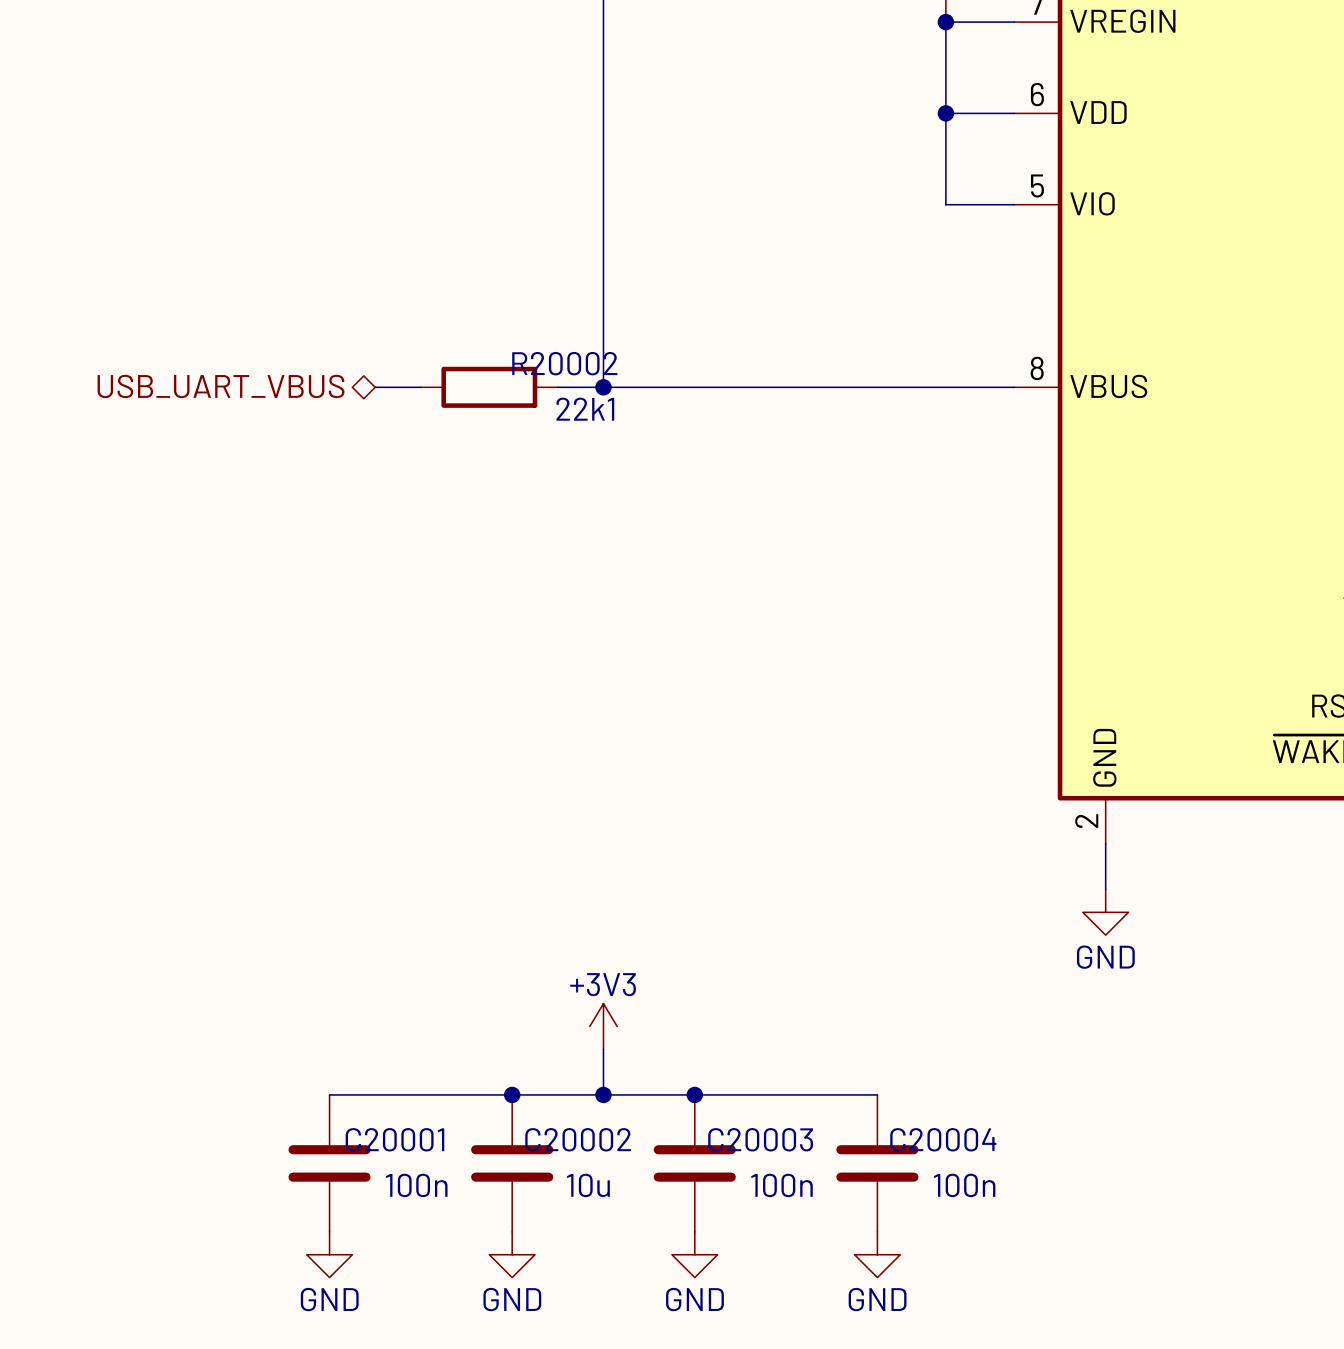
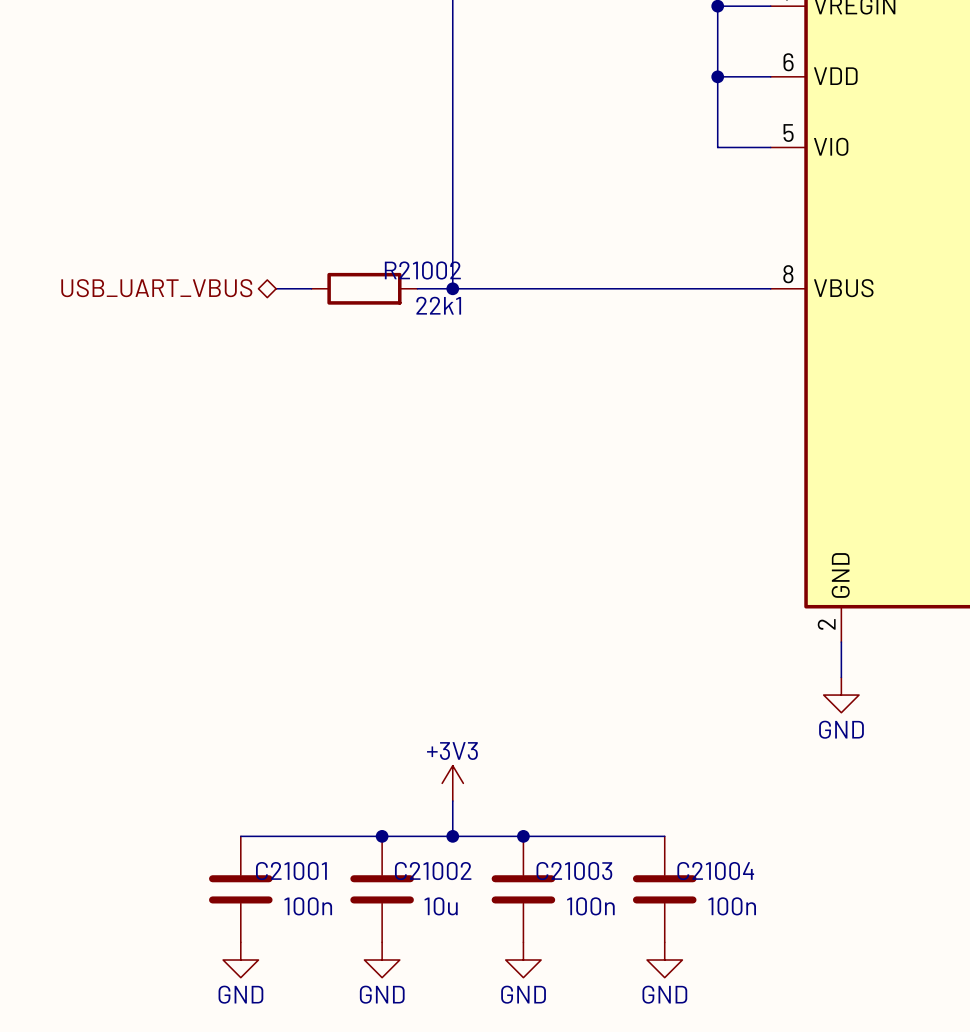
R20002 name: R20002 (564, 363) -> R21002 (422, 270)
C20001 name: C20001 (394, 1139) -> C21001 (291, 871)
C20002 name: C20002 (578, 1139) -> C21002 (433, 871)
C20003 name: C20003 (760, 1139) -> C21003 (574, 871)
C20004 name: C20004 (943, 1139) -> C21004 (715, 871)

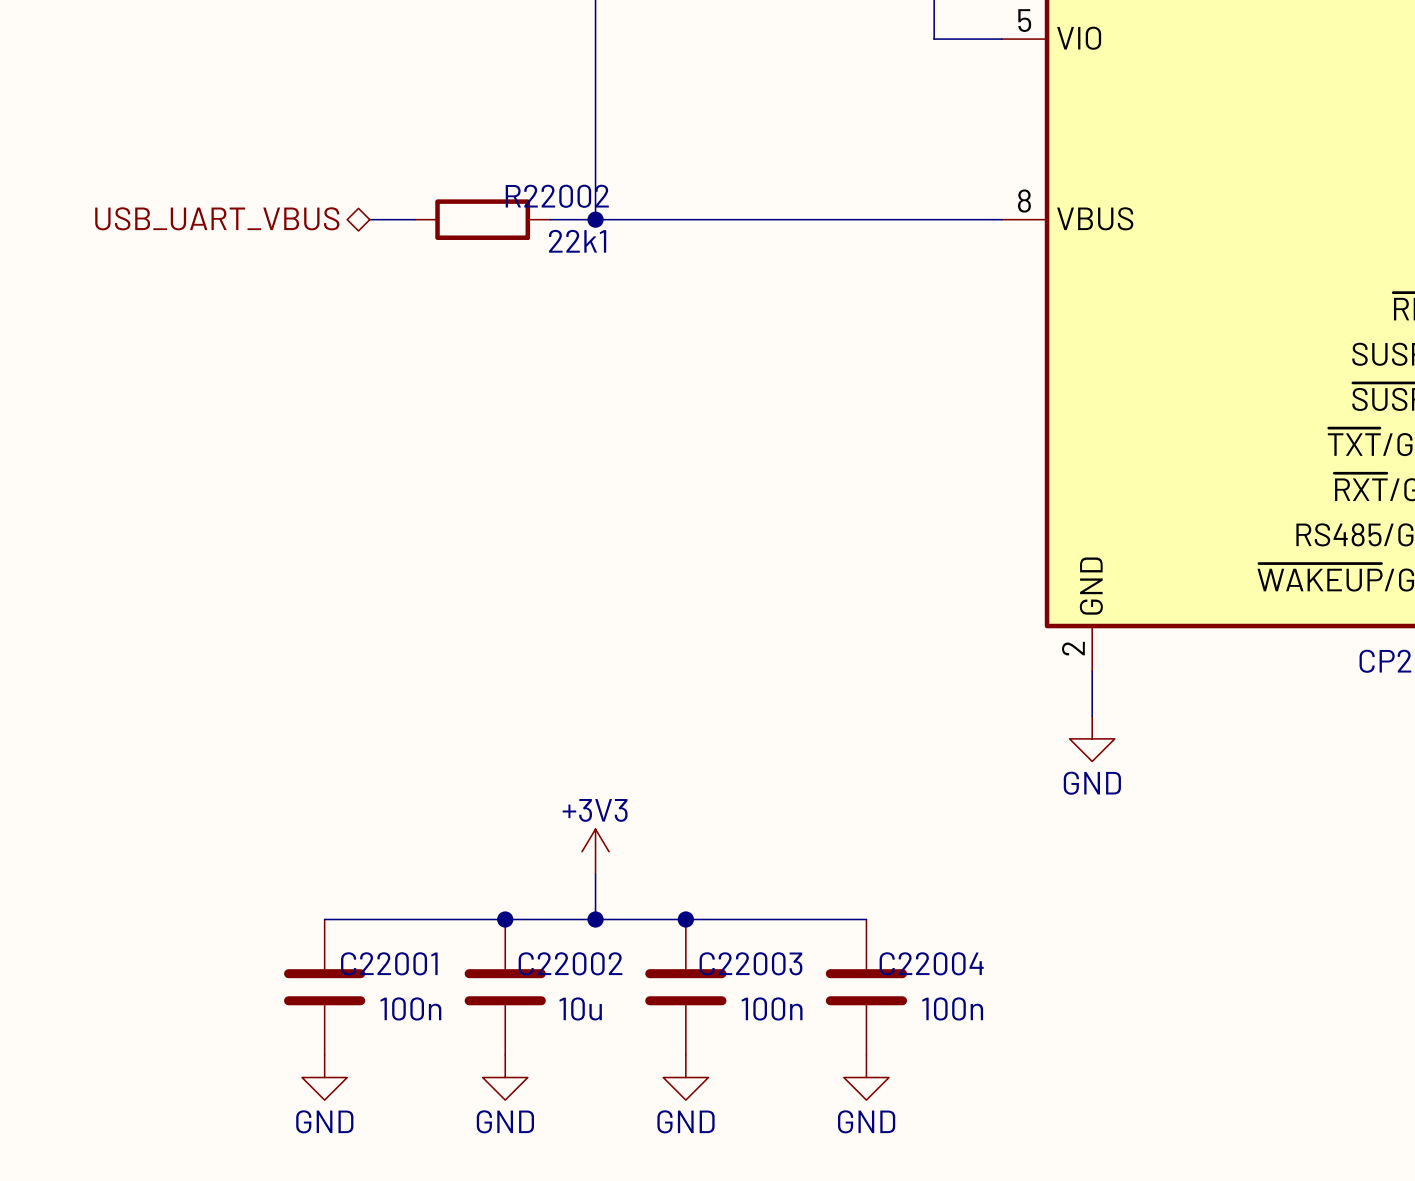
R21002 name: R21002 (422, 270) -> R22002 (557, 196)
C21001 name: C21001 (291, 871) -> C22001 (389, 963)
C21002 name: C21002 (433, 871) -> C22002 (570, 963)
C21003 name: C21003 (574, 871) -> C22003 (750, 963)
C21004 name: C21004 (715, 871) -> C22004 (931, 963)

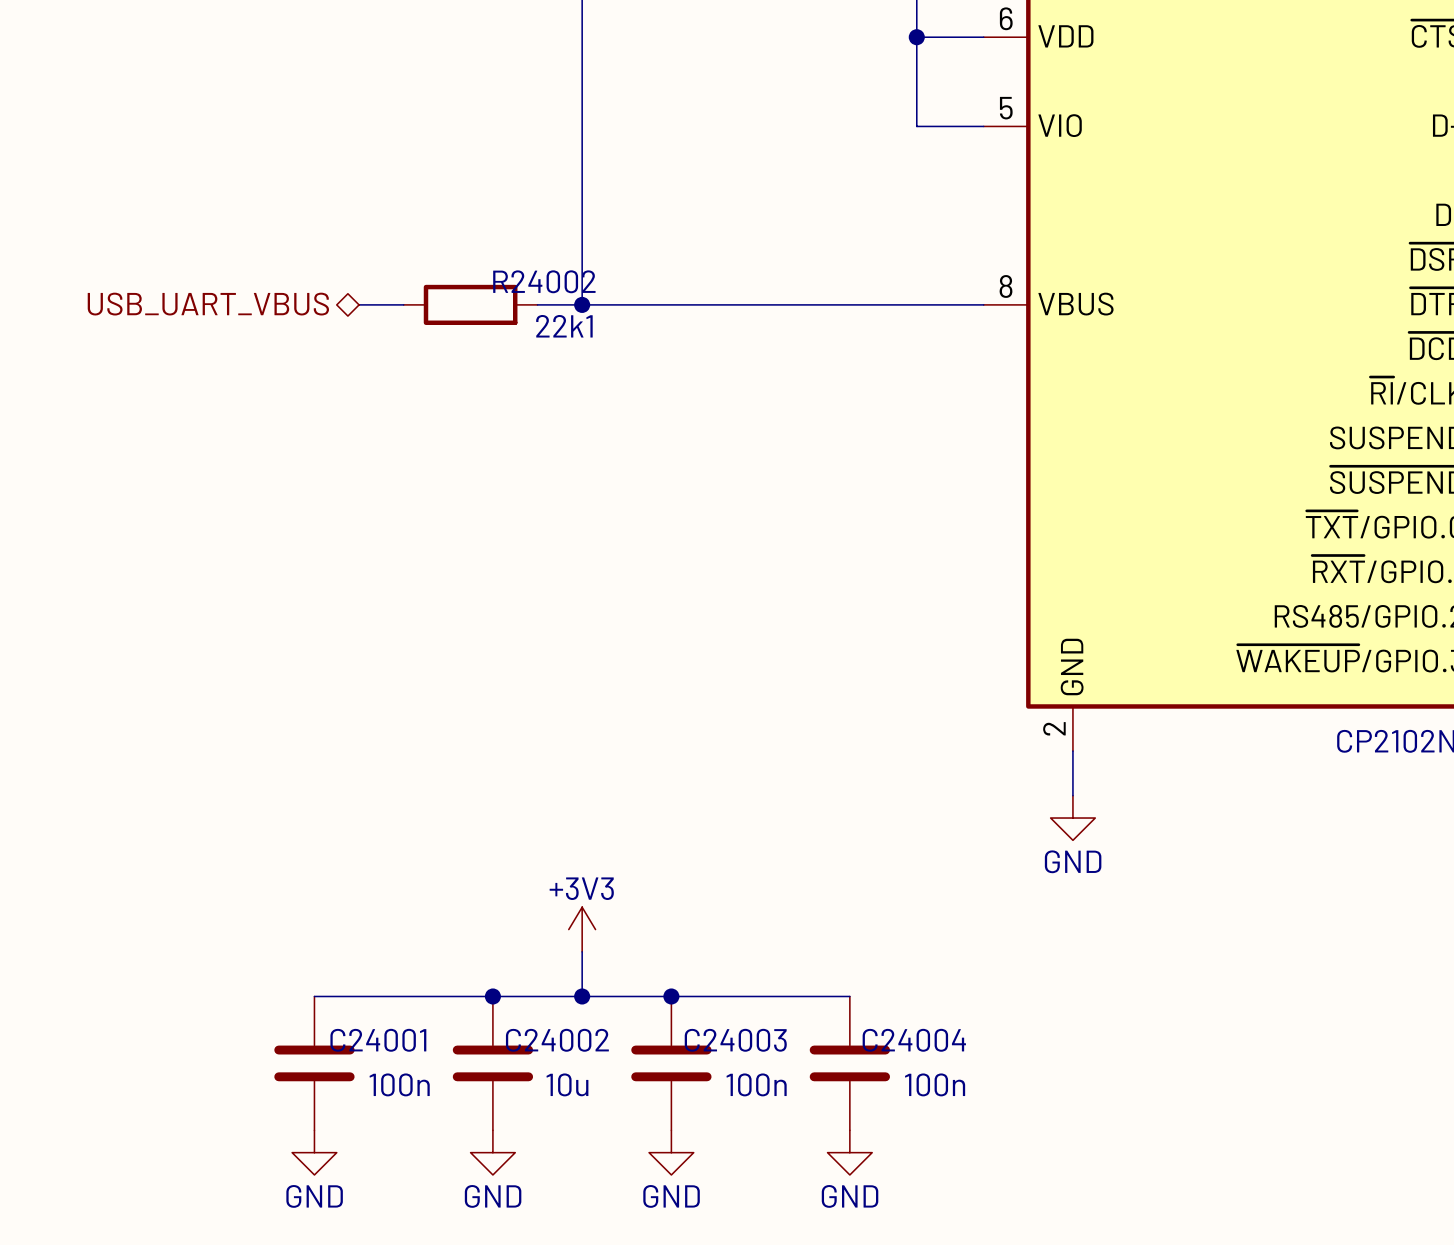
R22002 name: R22002 (557, 196) -> R24002 (544, 281)
C22001 name: C22001 (389, 963) -> C24001 (378, 1040)
C22002 name: C22002 (570, 963) -> C24002 (557, 1040)
C22003 name: C22003 (750, 963) -> C24003 (735, 1040)
C22004 name: C22004 (931, 963) -> C24004 (914, 1040)

